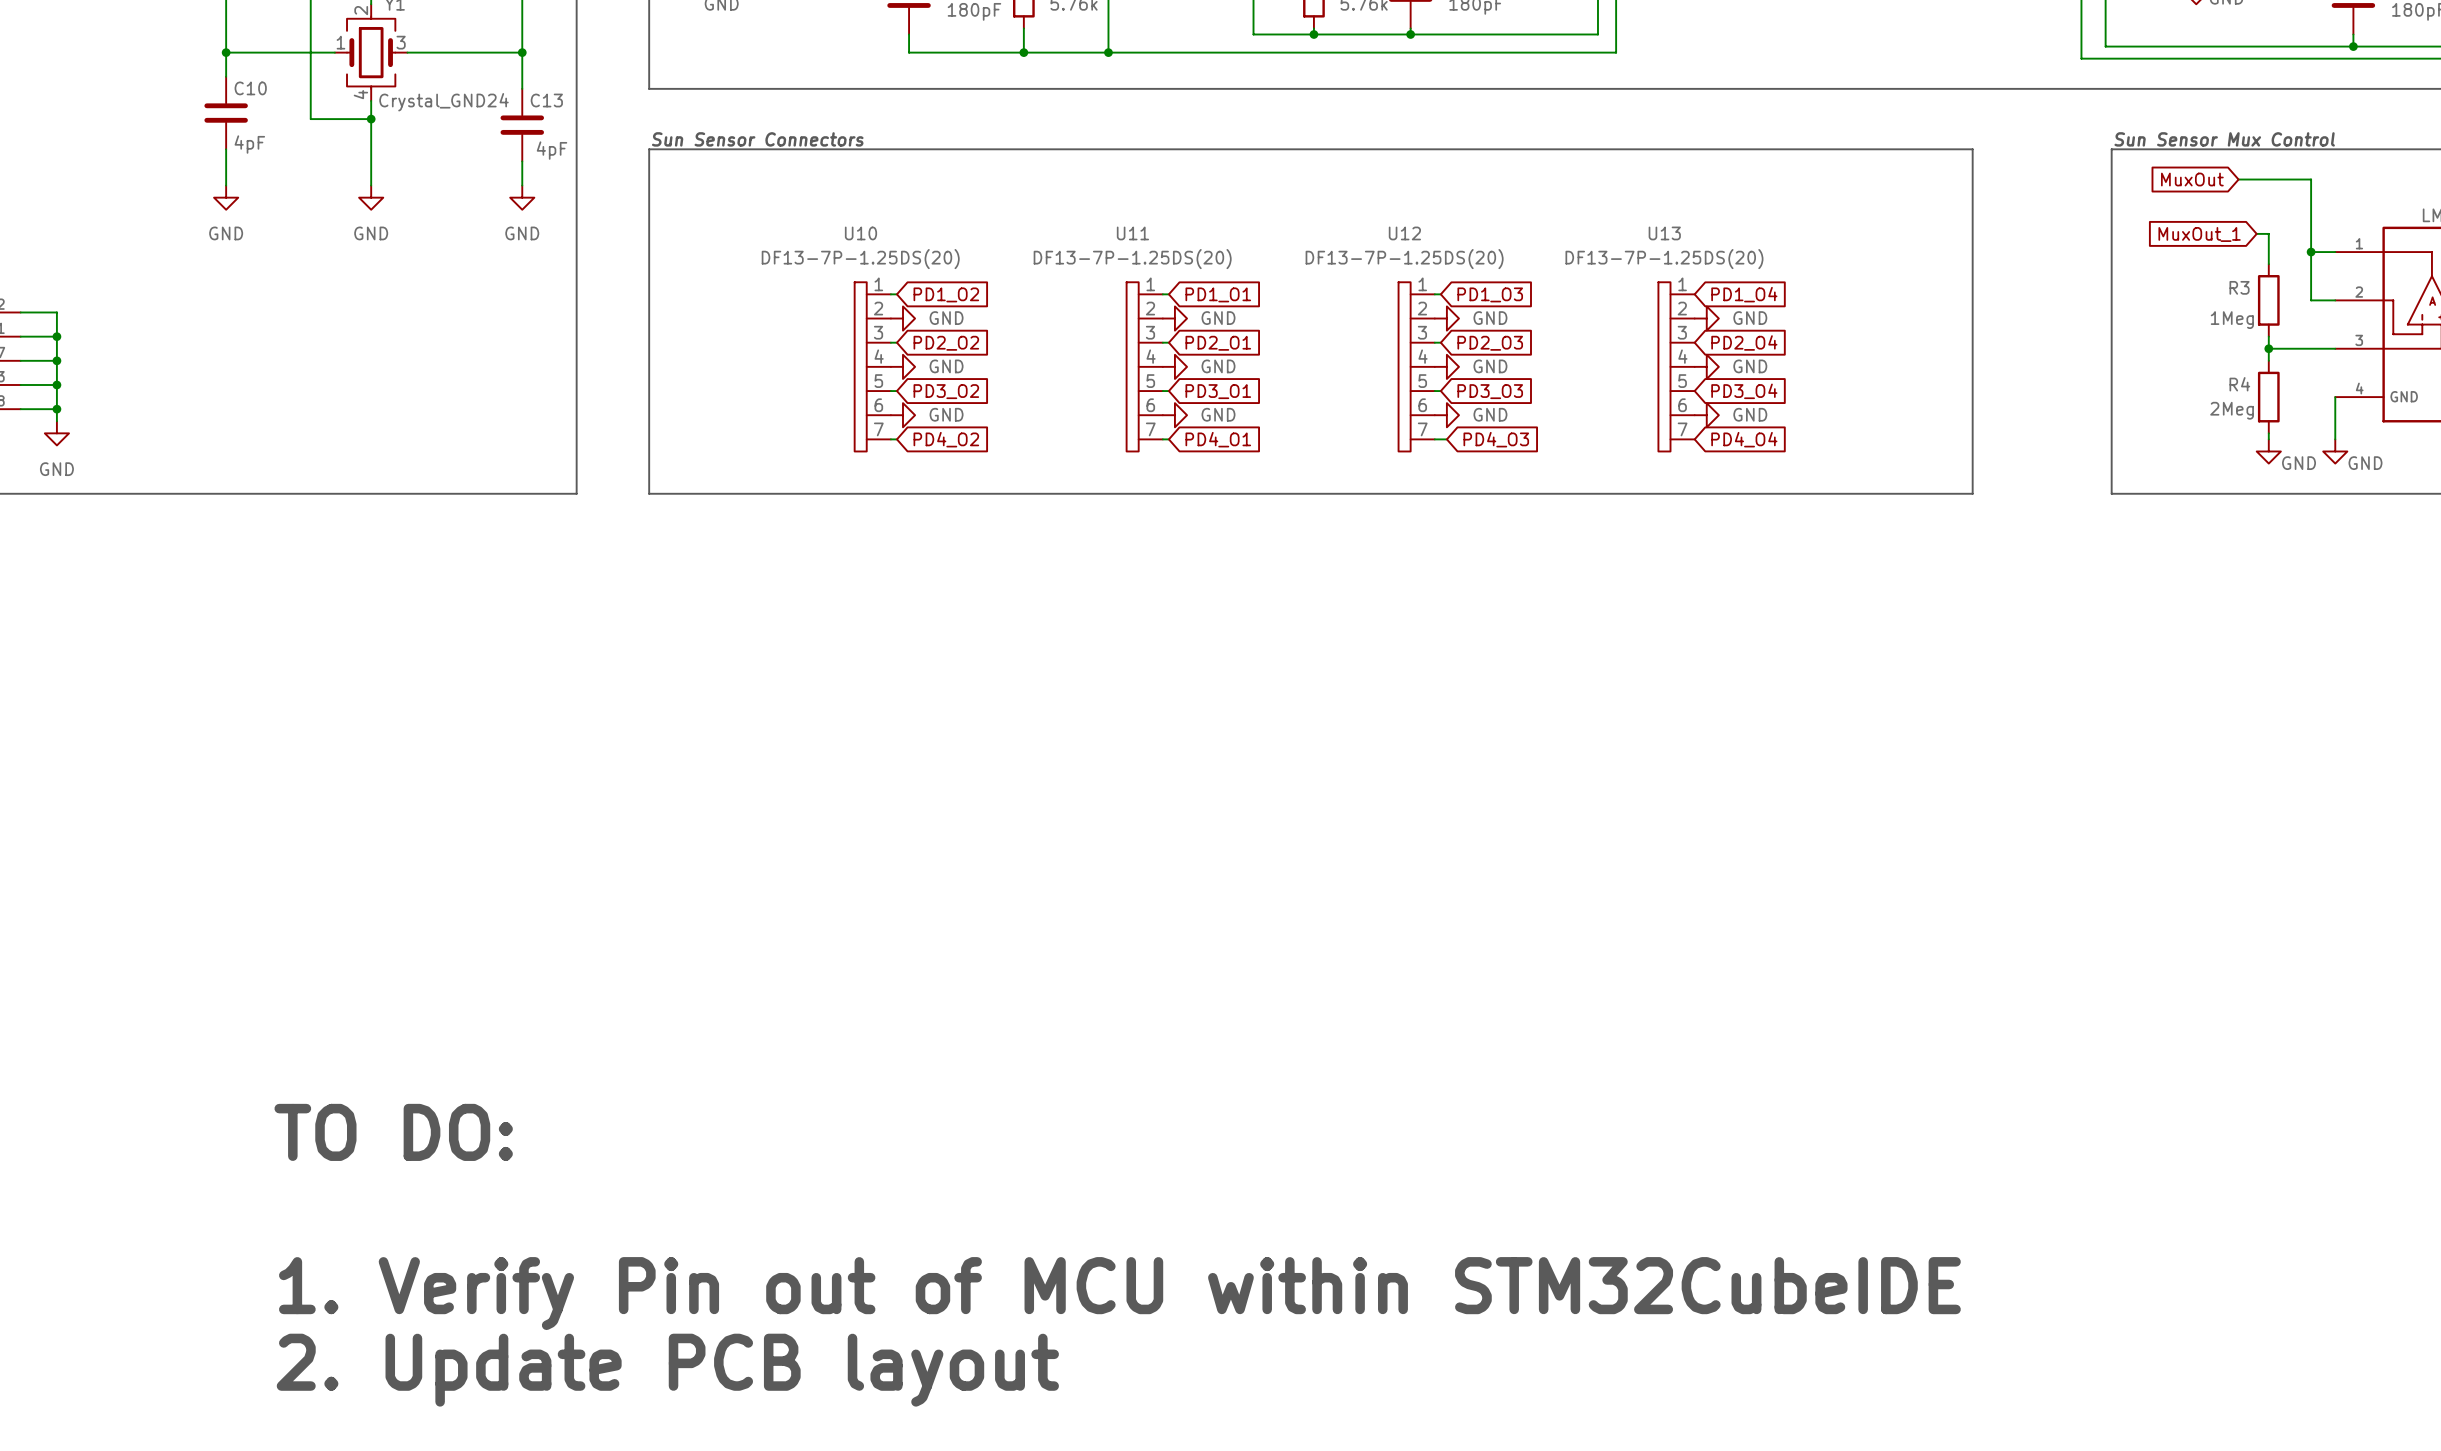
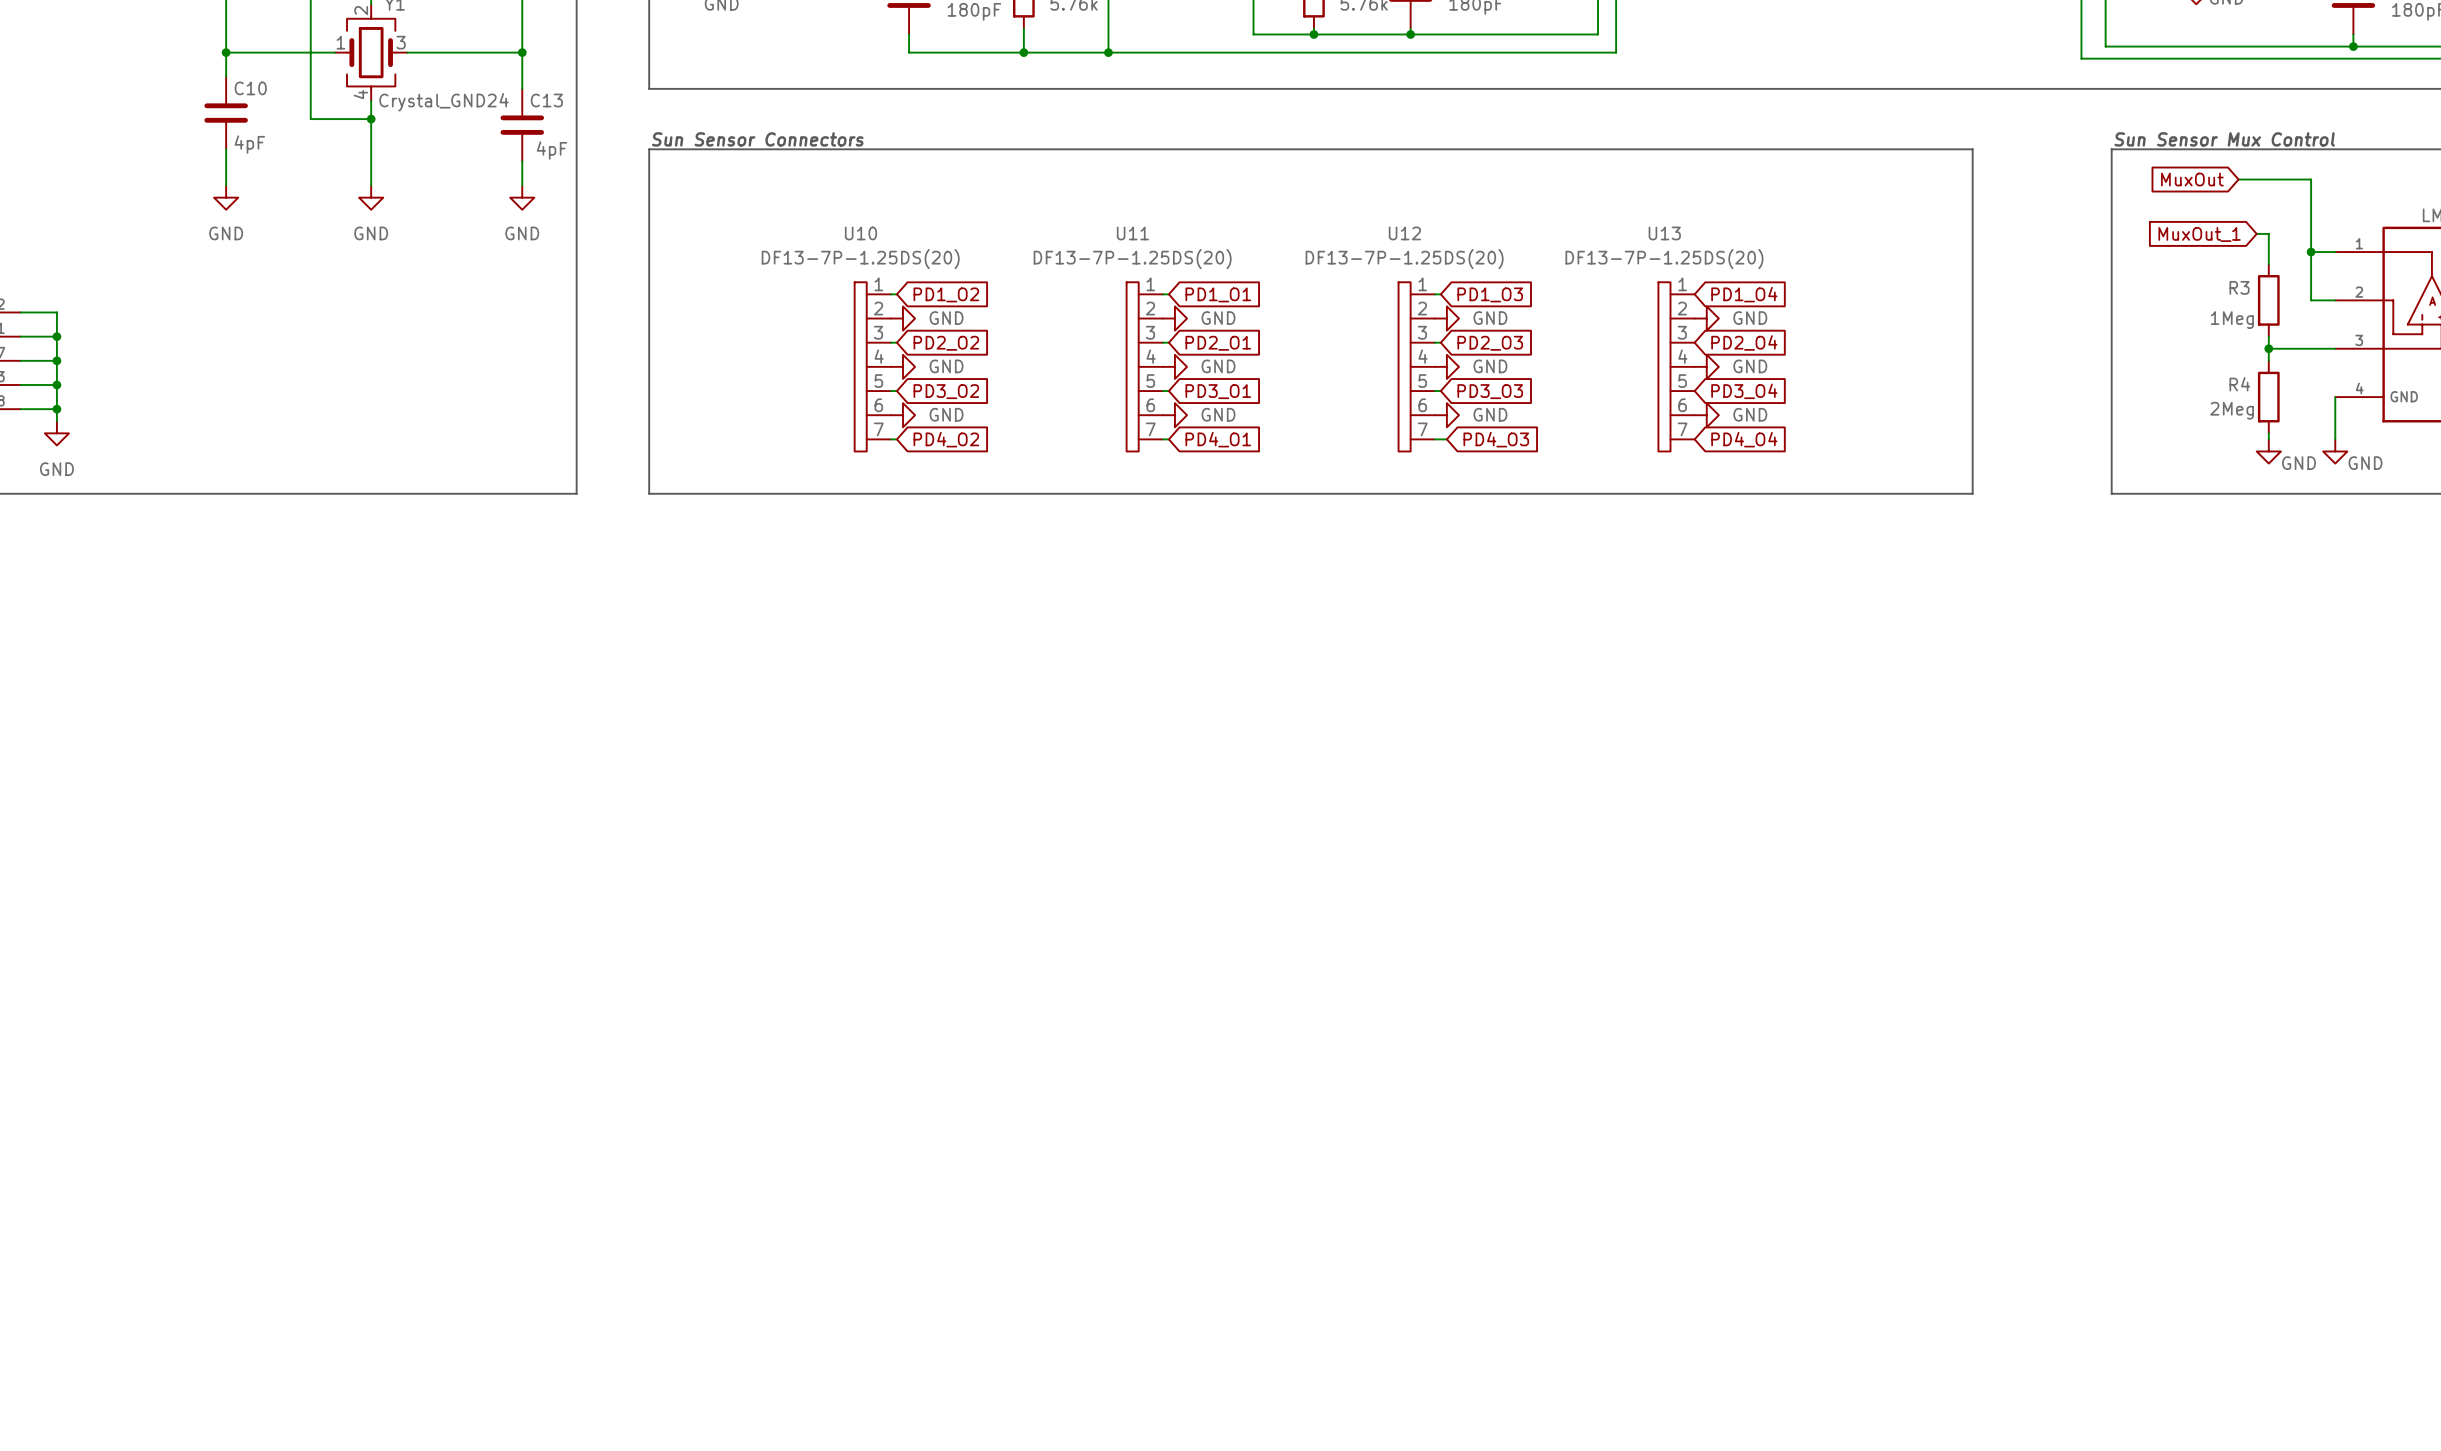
text: TO DO: (393, 1132) -> none
text: 1. Verify Pin out of MCU within STM32CubeIDE (1119, 1293) -> none
text: 2. Update PCB layout (667, 1370) -> none

